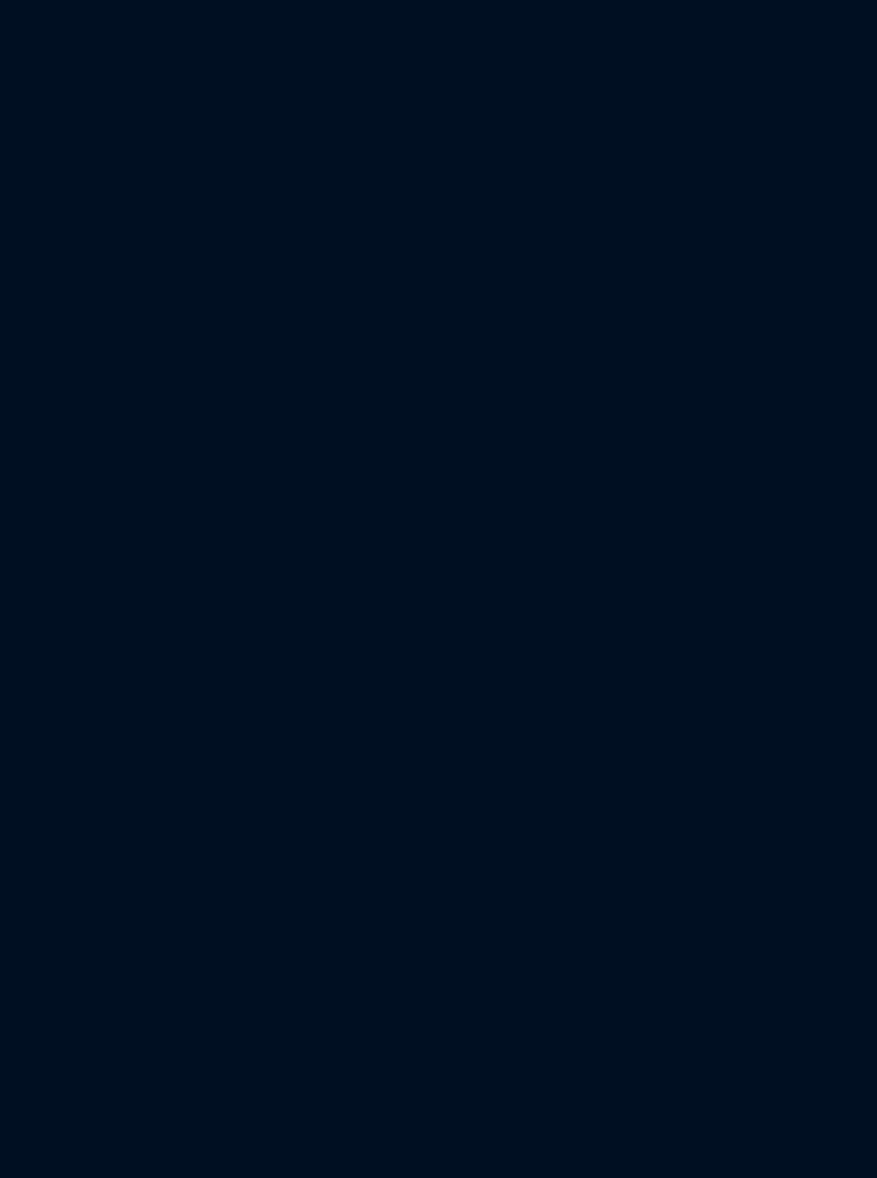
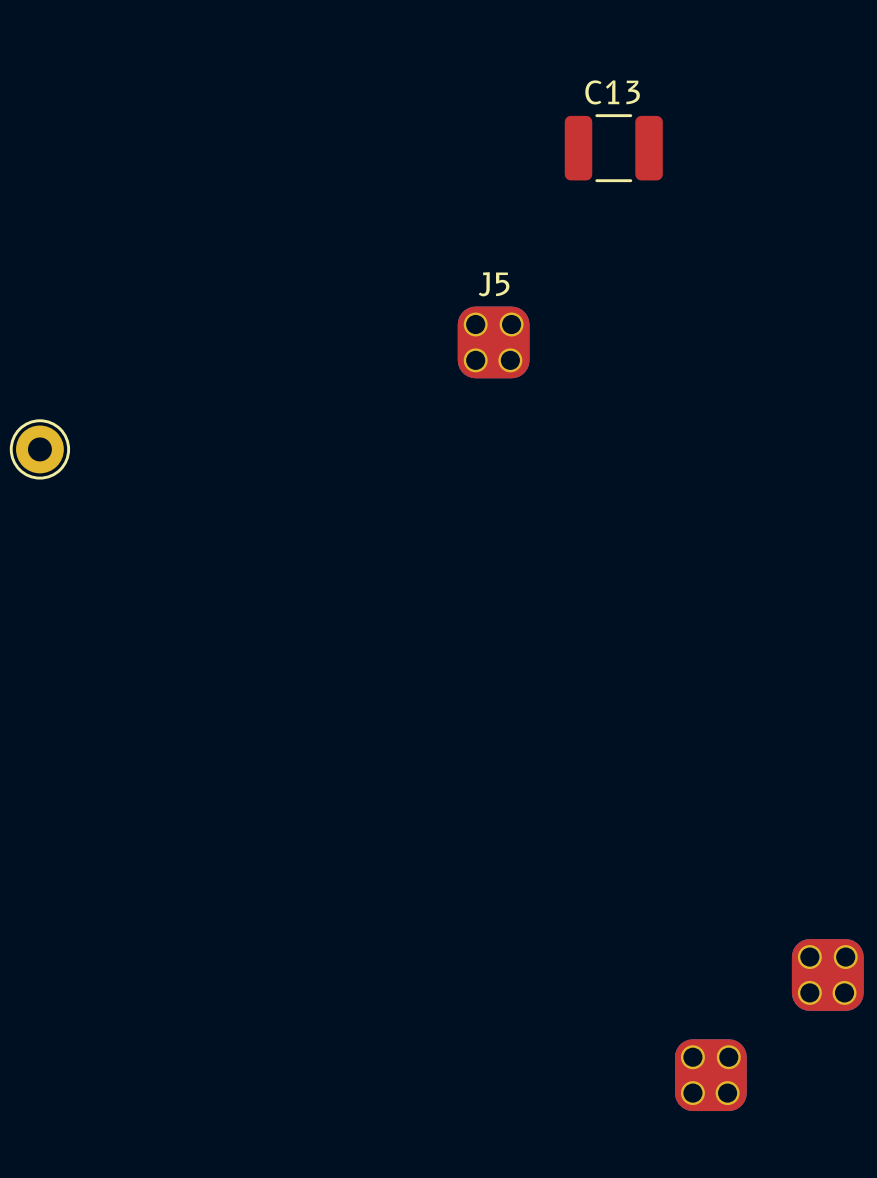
C13: none -> (613, 148)
J5: none -> (493, 342)
part: none -> (39, 449)
part: none -> (827, 974)
part: none -> (710, 1075)

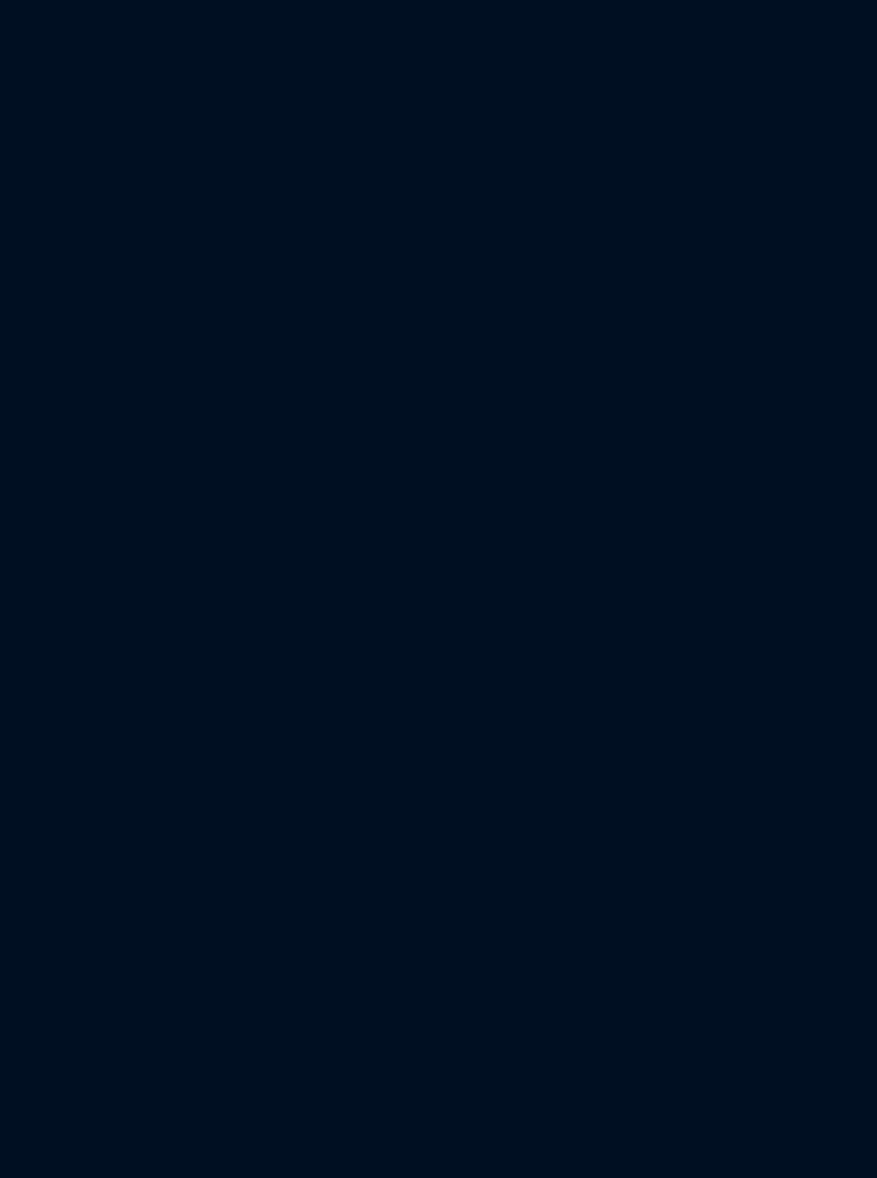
C13: (613, 148) -> none
J5: (493, 342) -> none
part: (39, 449) -> none
part: (827, 974) -> none
part: (710, 1075) -> none

